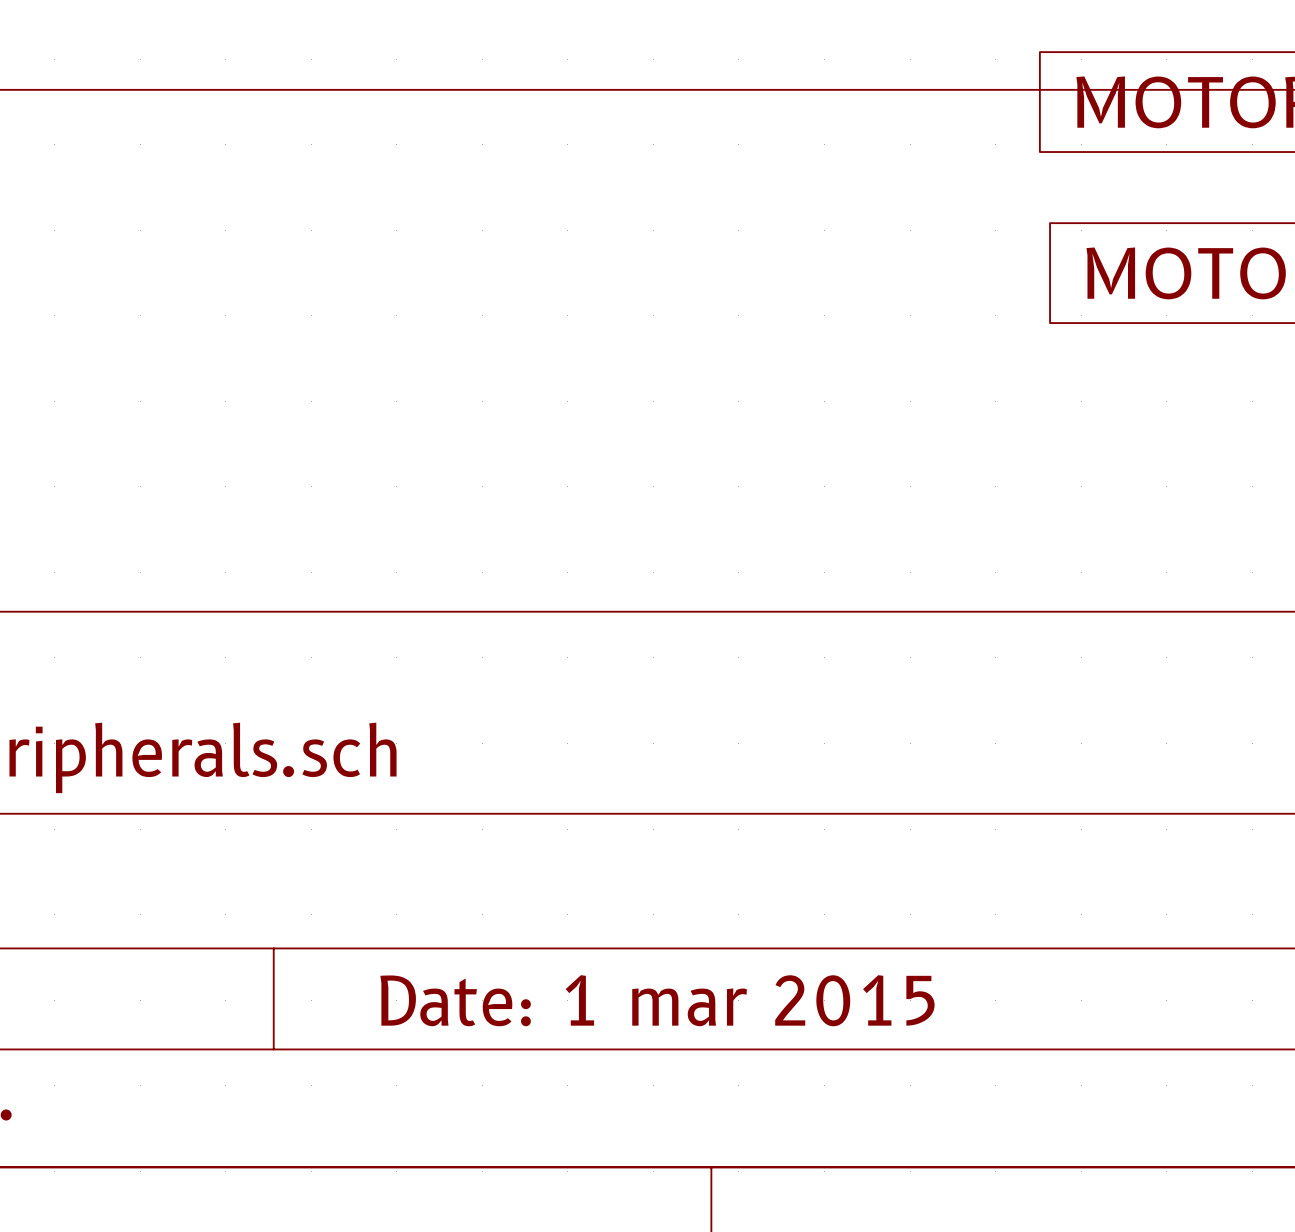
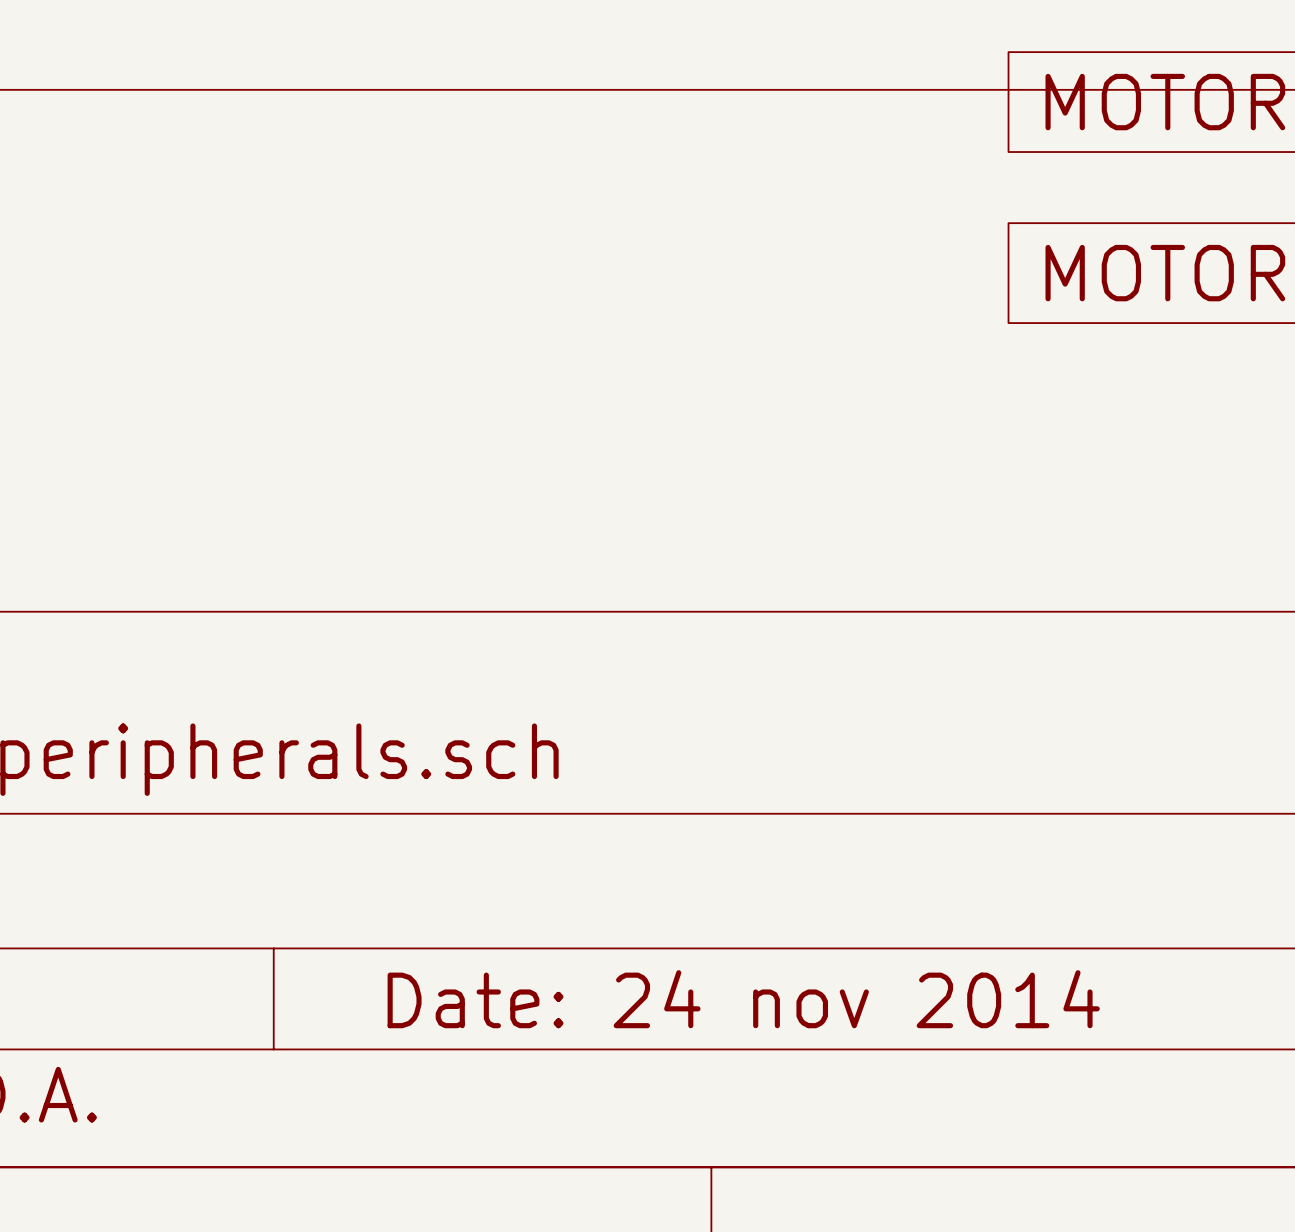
title block: Date: 1 mar 2015 (657, 1000) -> Date: 24 nov 2014 (743, 999)

